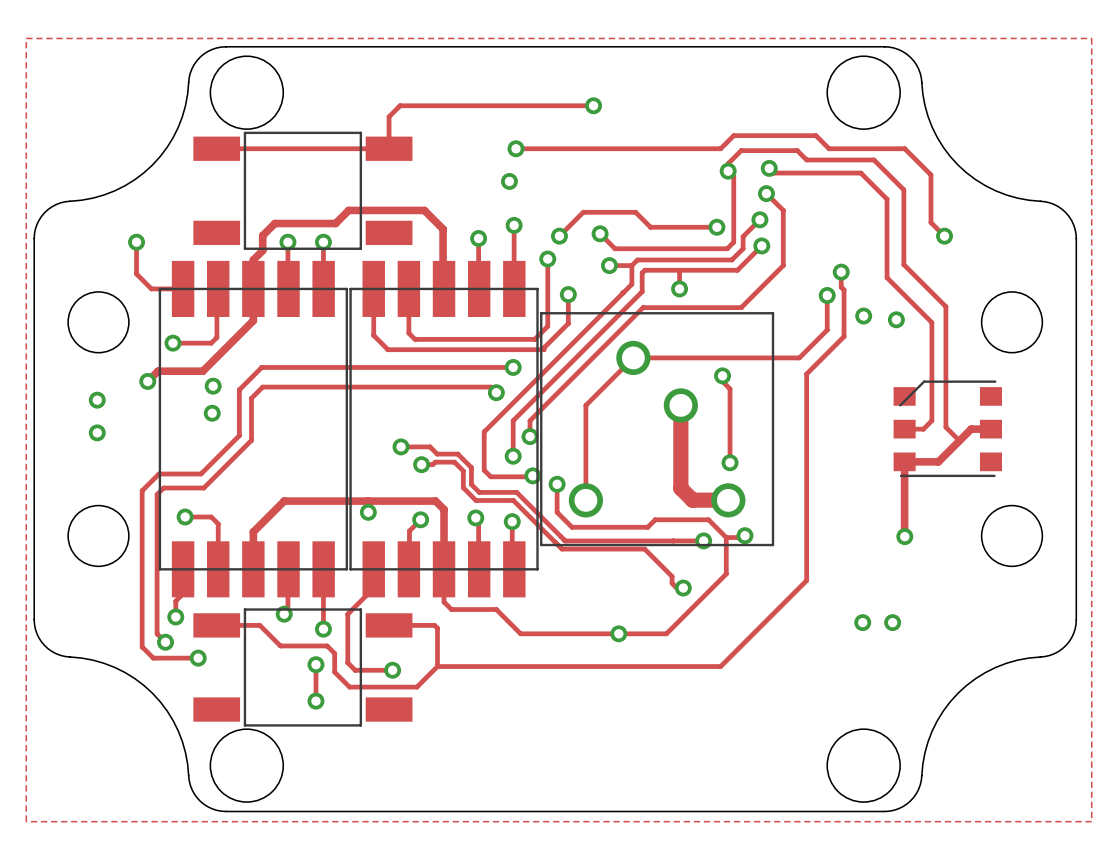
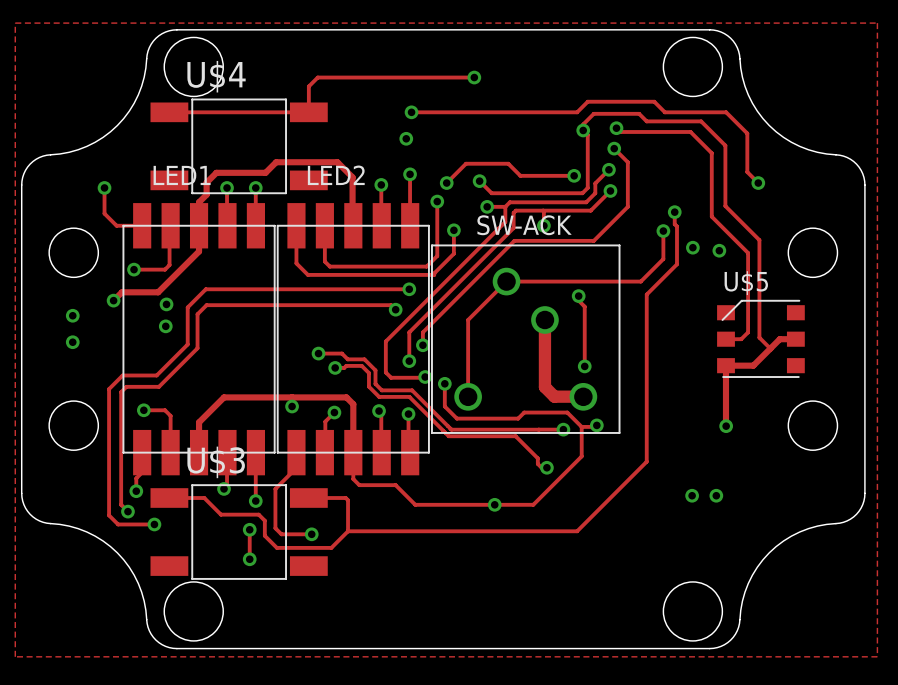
U$4 name: none -> U$4 (216, 76)
LED1 name: none -> LED1 (182, 175)
LED2 name: none -> LED2 (336, 175)
SW-ACK name: none -> SW-ACK (524, 225)
U$5 name: none -> U$5 (746, 283)
U$3 name: none -> U$3 (216, 462)

